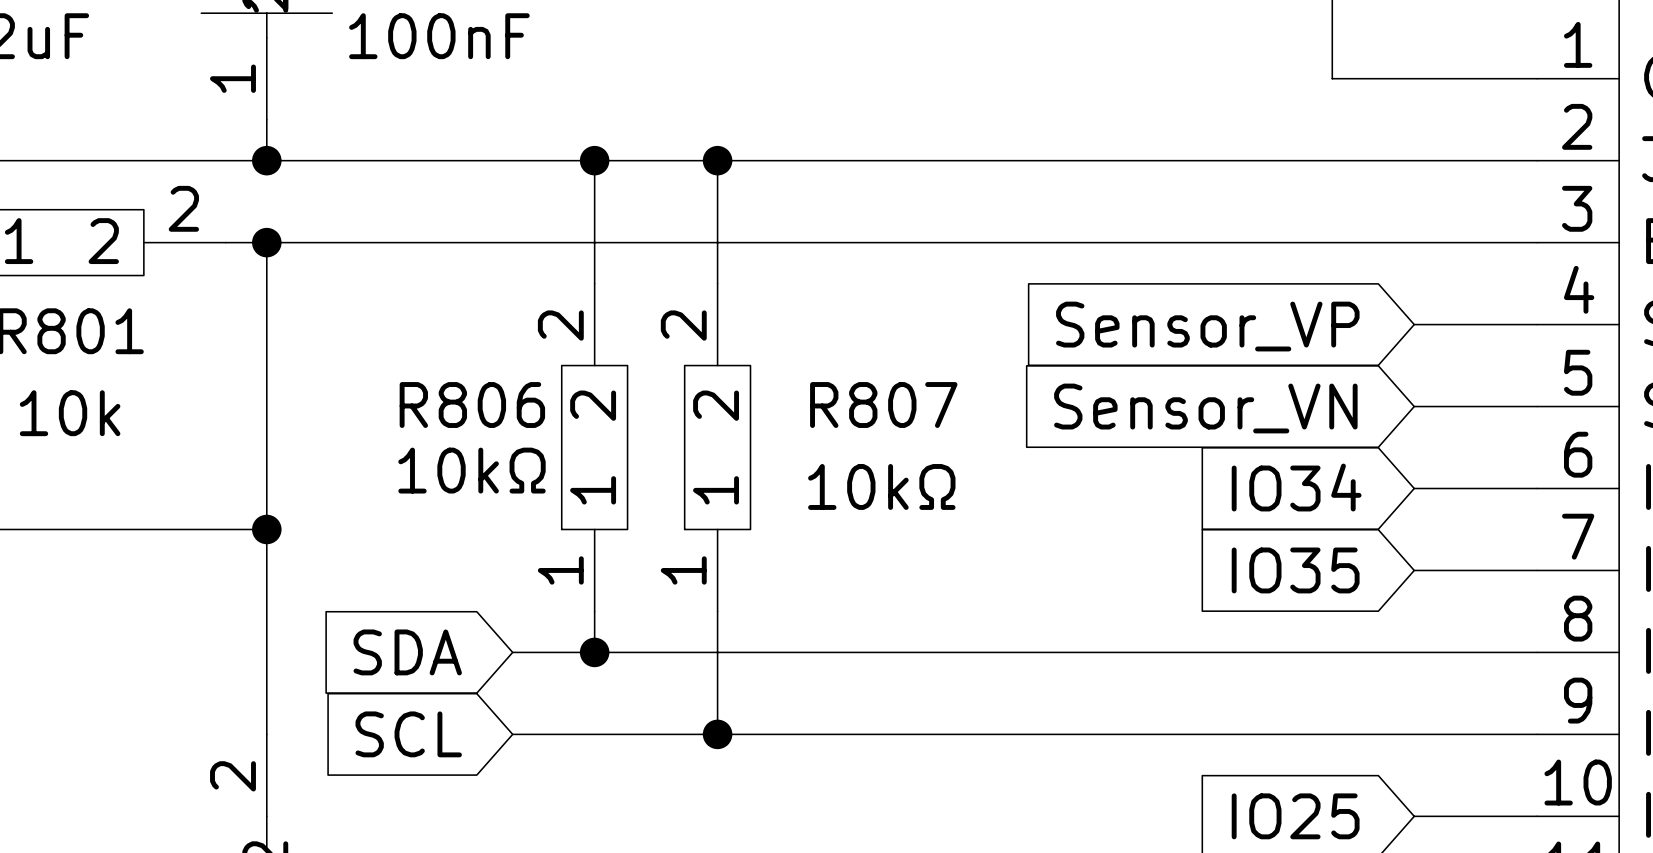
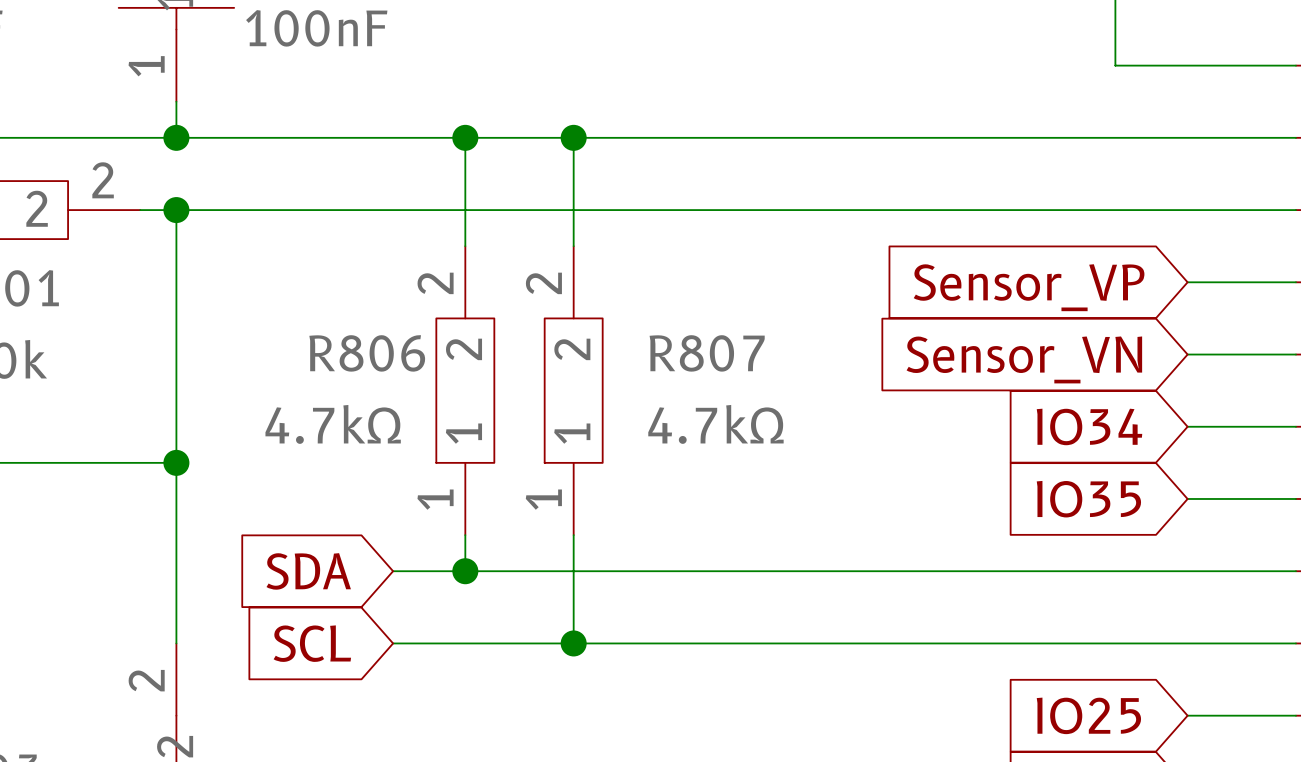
R806 value: 10kΩ (472, 470) -> 4.7kΩ (333, 424)
R807 value: 10kΩ (881, 486) -> 4.7kΩ (715, 424)

